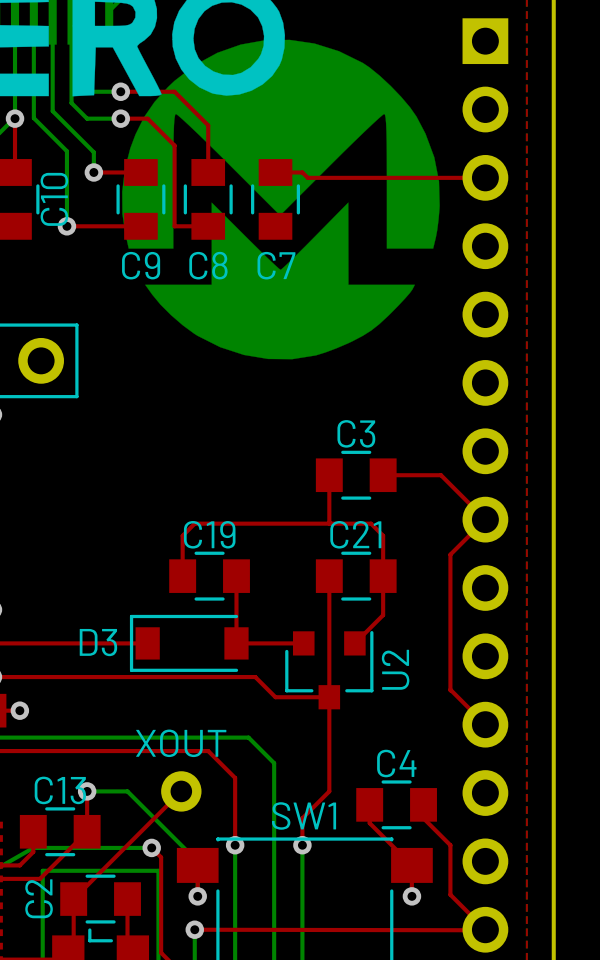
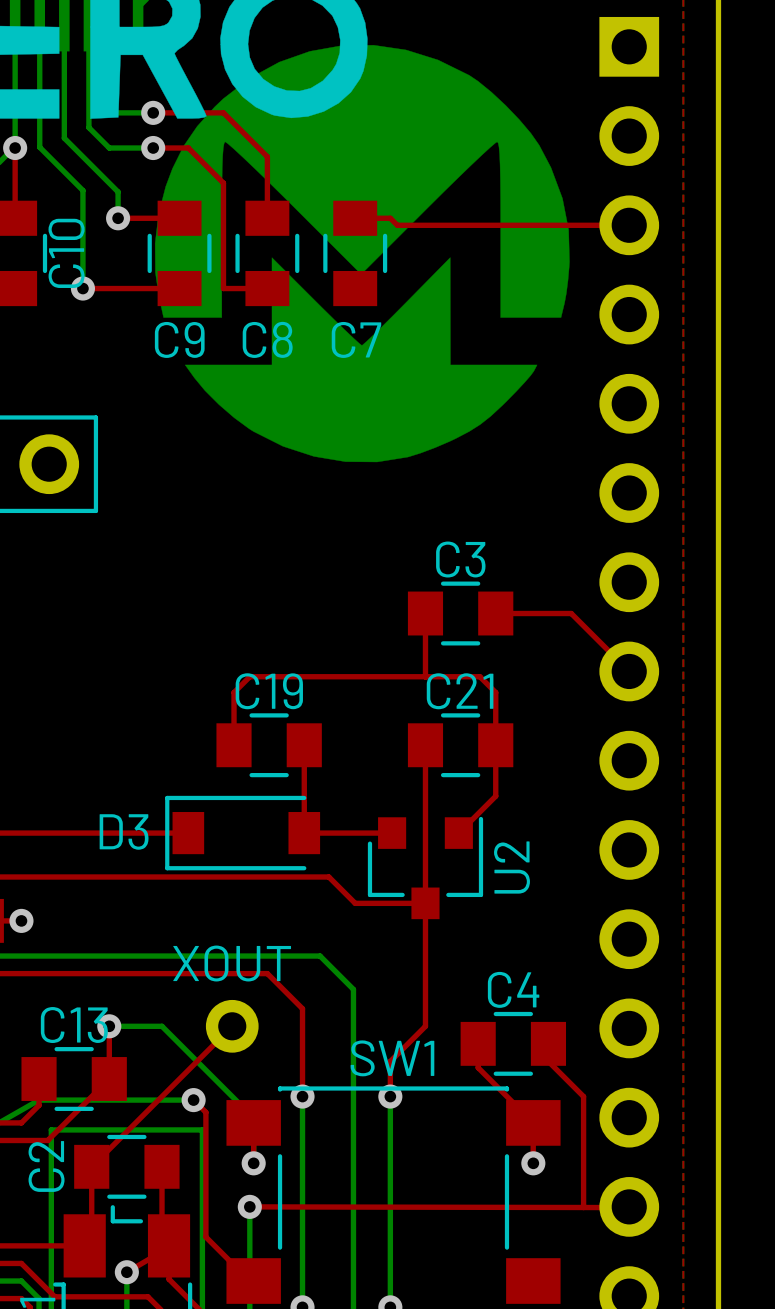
top track: (485, 519) (450, 554) (450, 690) -> none
top track: (450, 689) (485, 724) -> none
top track: (450, 894) (485, 929) -> (583, 1161) (583, 1207)

